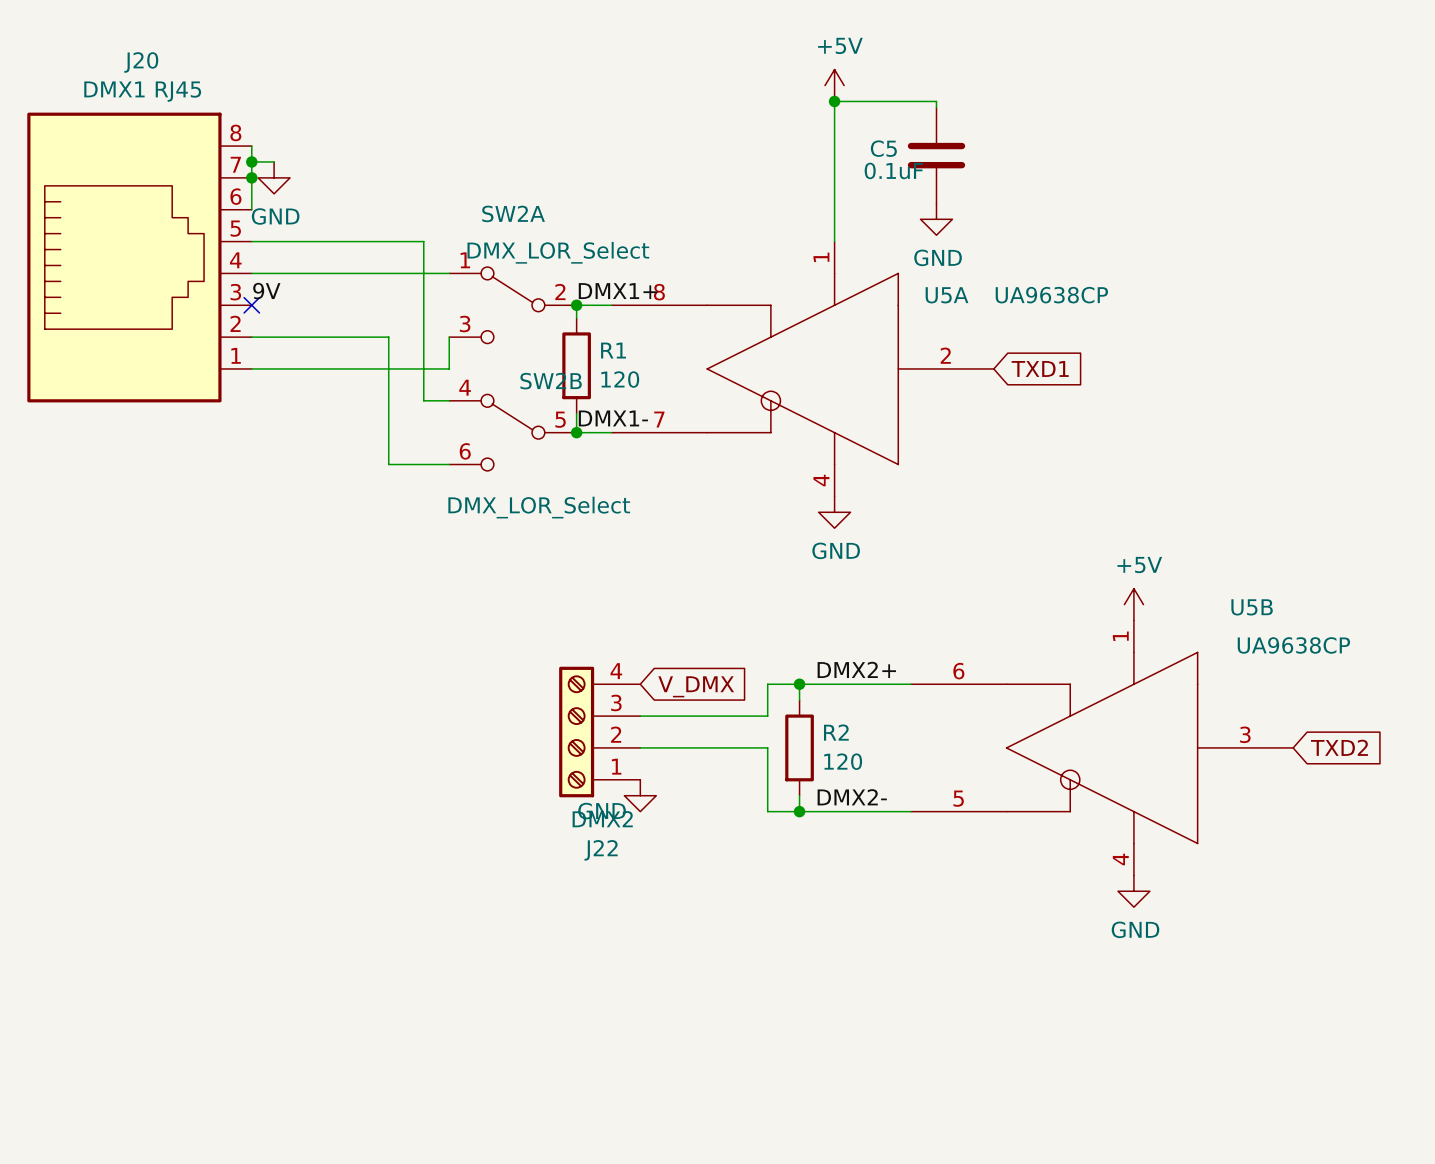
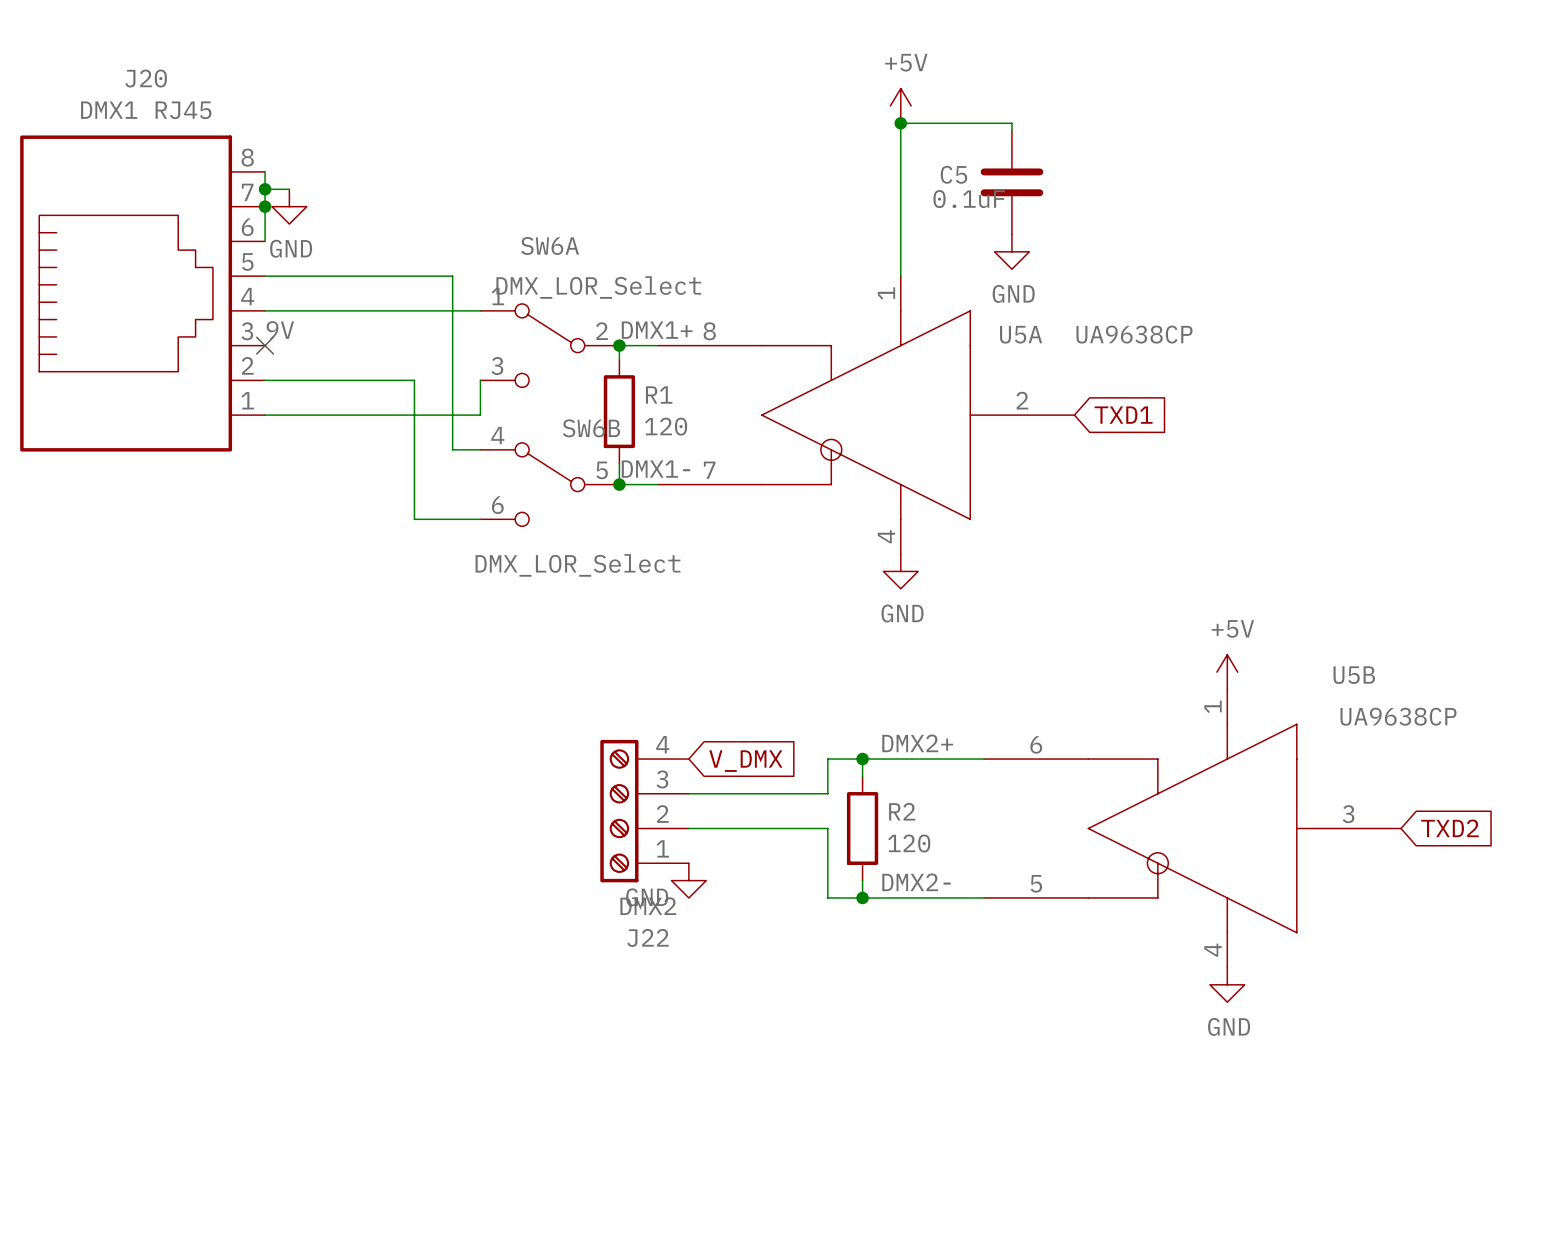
SW2A name: SW2A (513, 213) -> SW6A (550, 245)
SW2B name: SW2B (551, 381) -> SW6B (591, 428)

